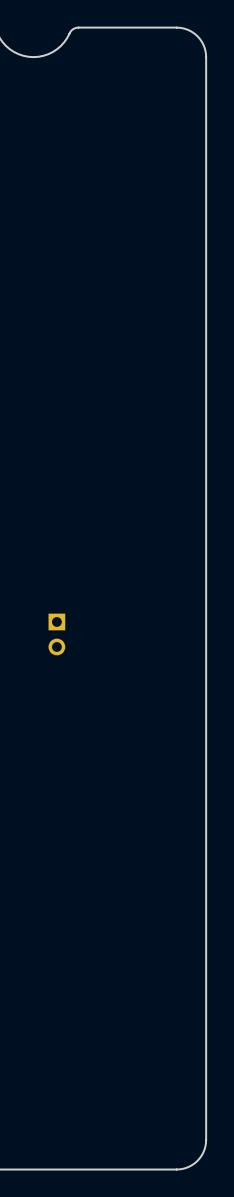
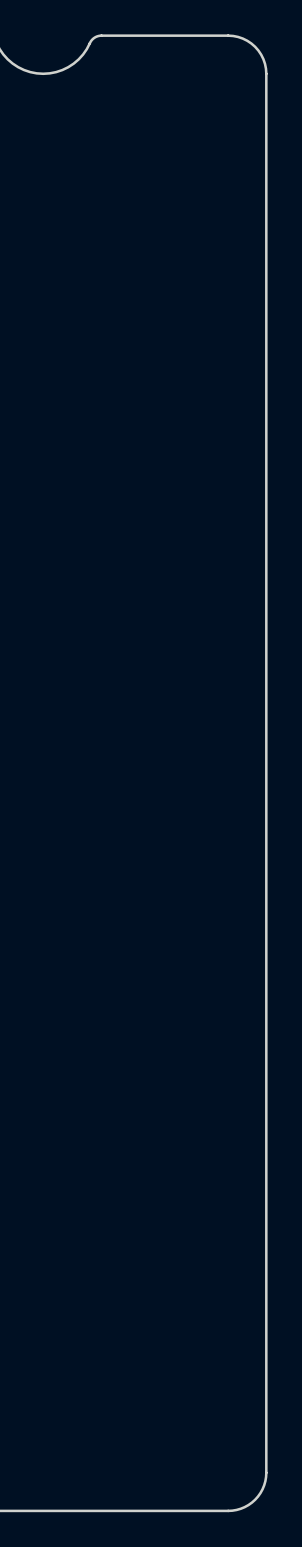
part: (56, 634) -> none

